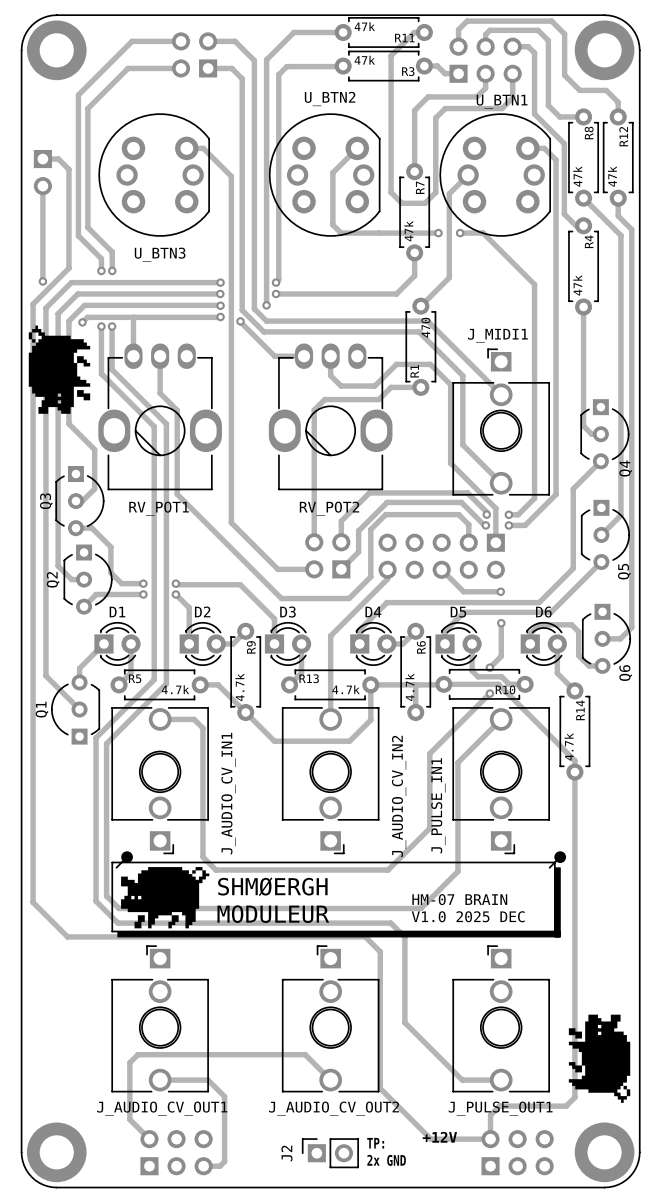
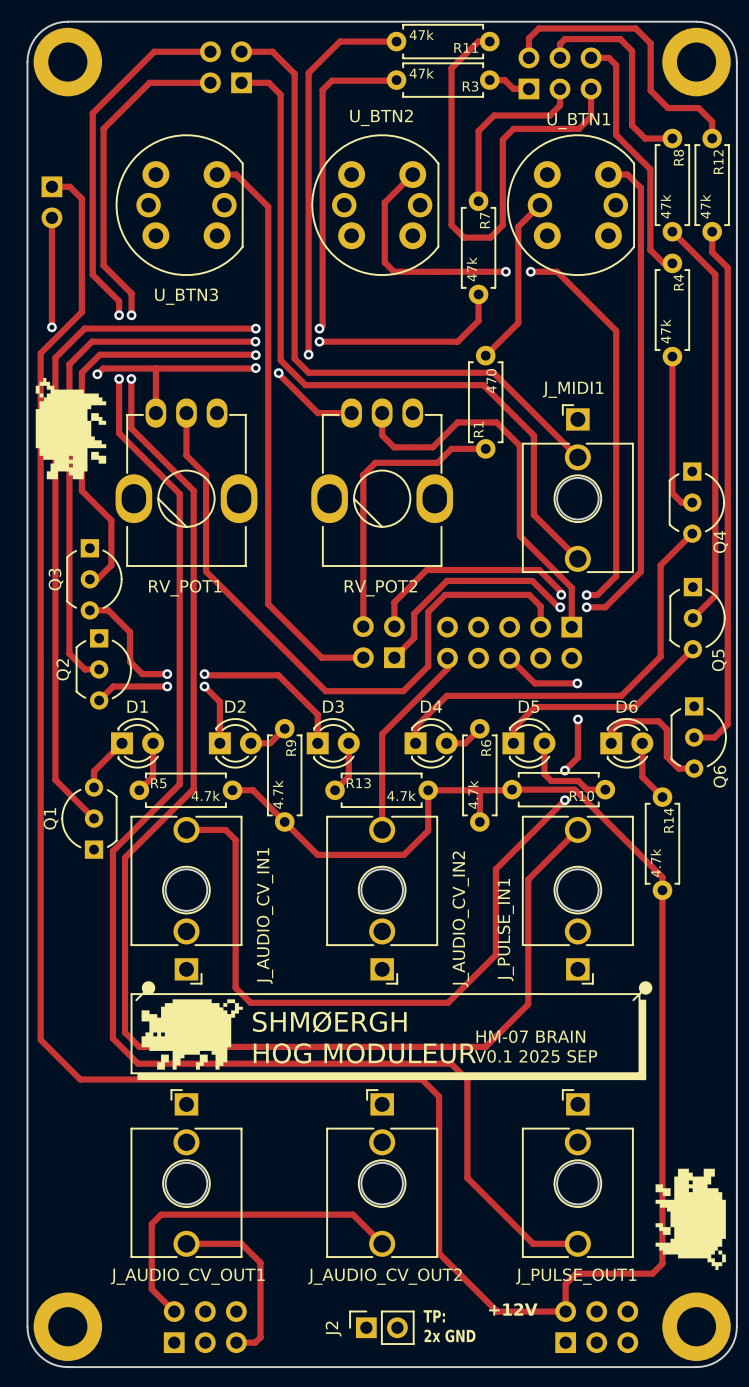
text: MODULEUR (273, 914) -> HOG MODULEUR (364, 1053)
text: V1.0 2025 DEC (468, 916) -> V0.1 2025 SEP (536, 1056)

